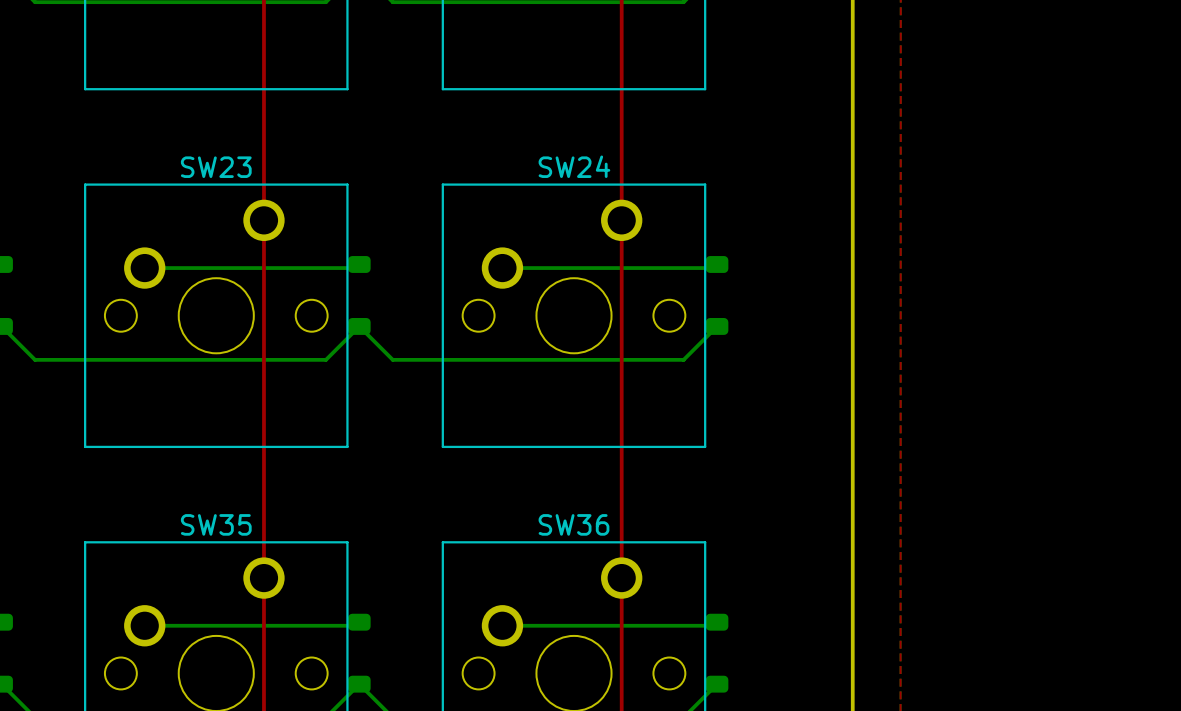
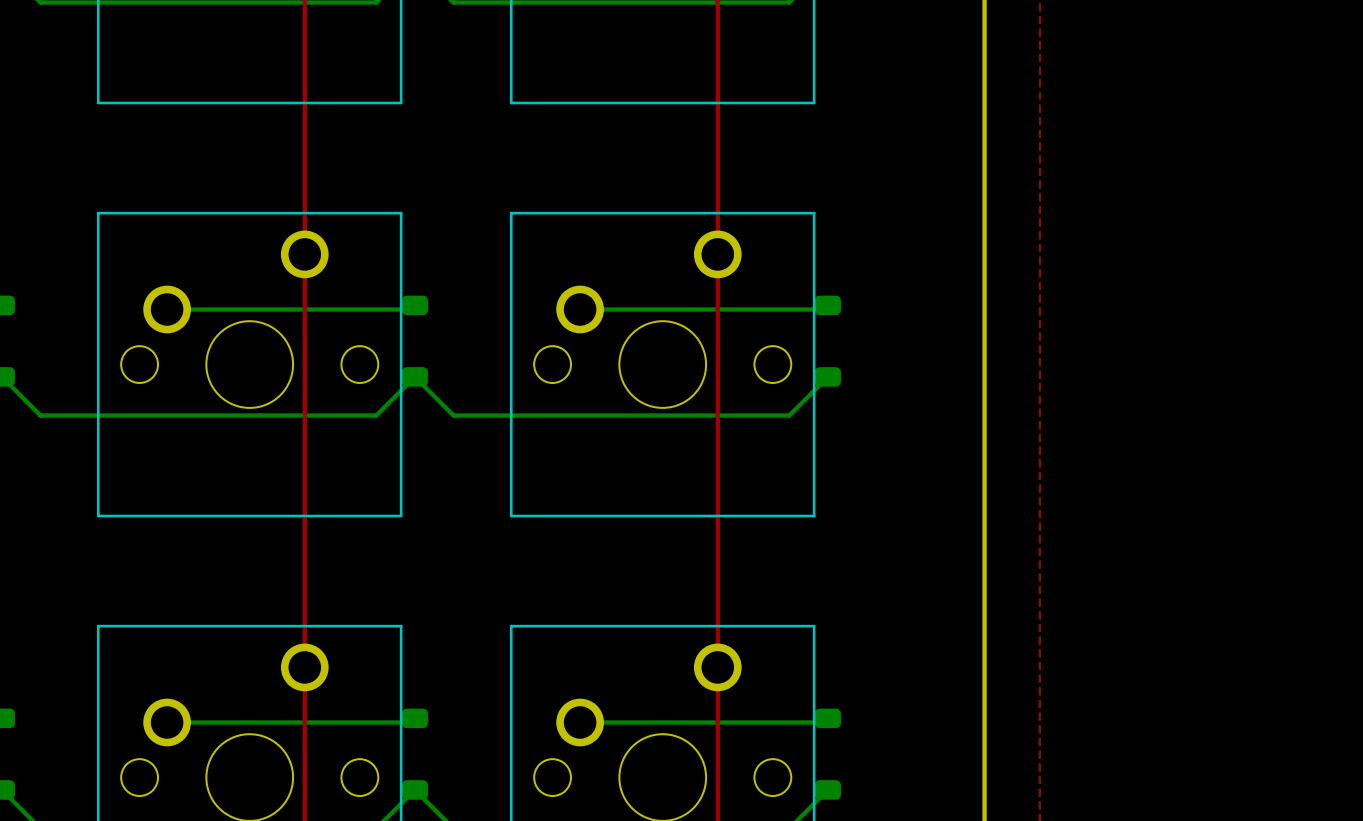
SW24 name: SW24 (574, 166) -> none
SW23 name: SW23 (216, 167) -> none
SW35 name: SW35 (216, 524) -> none
SW36 name: SW36 (574, 524) -> none

